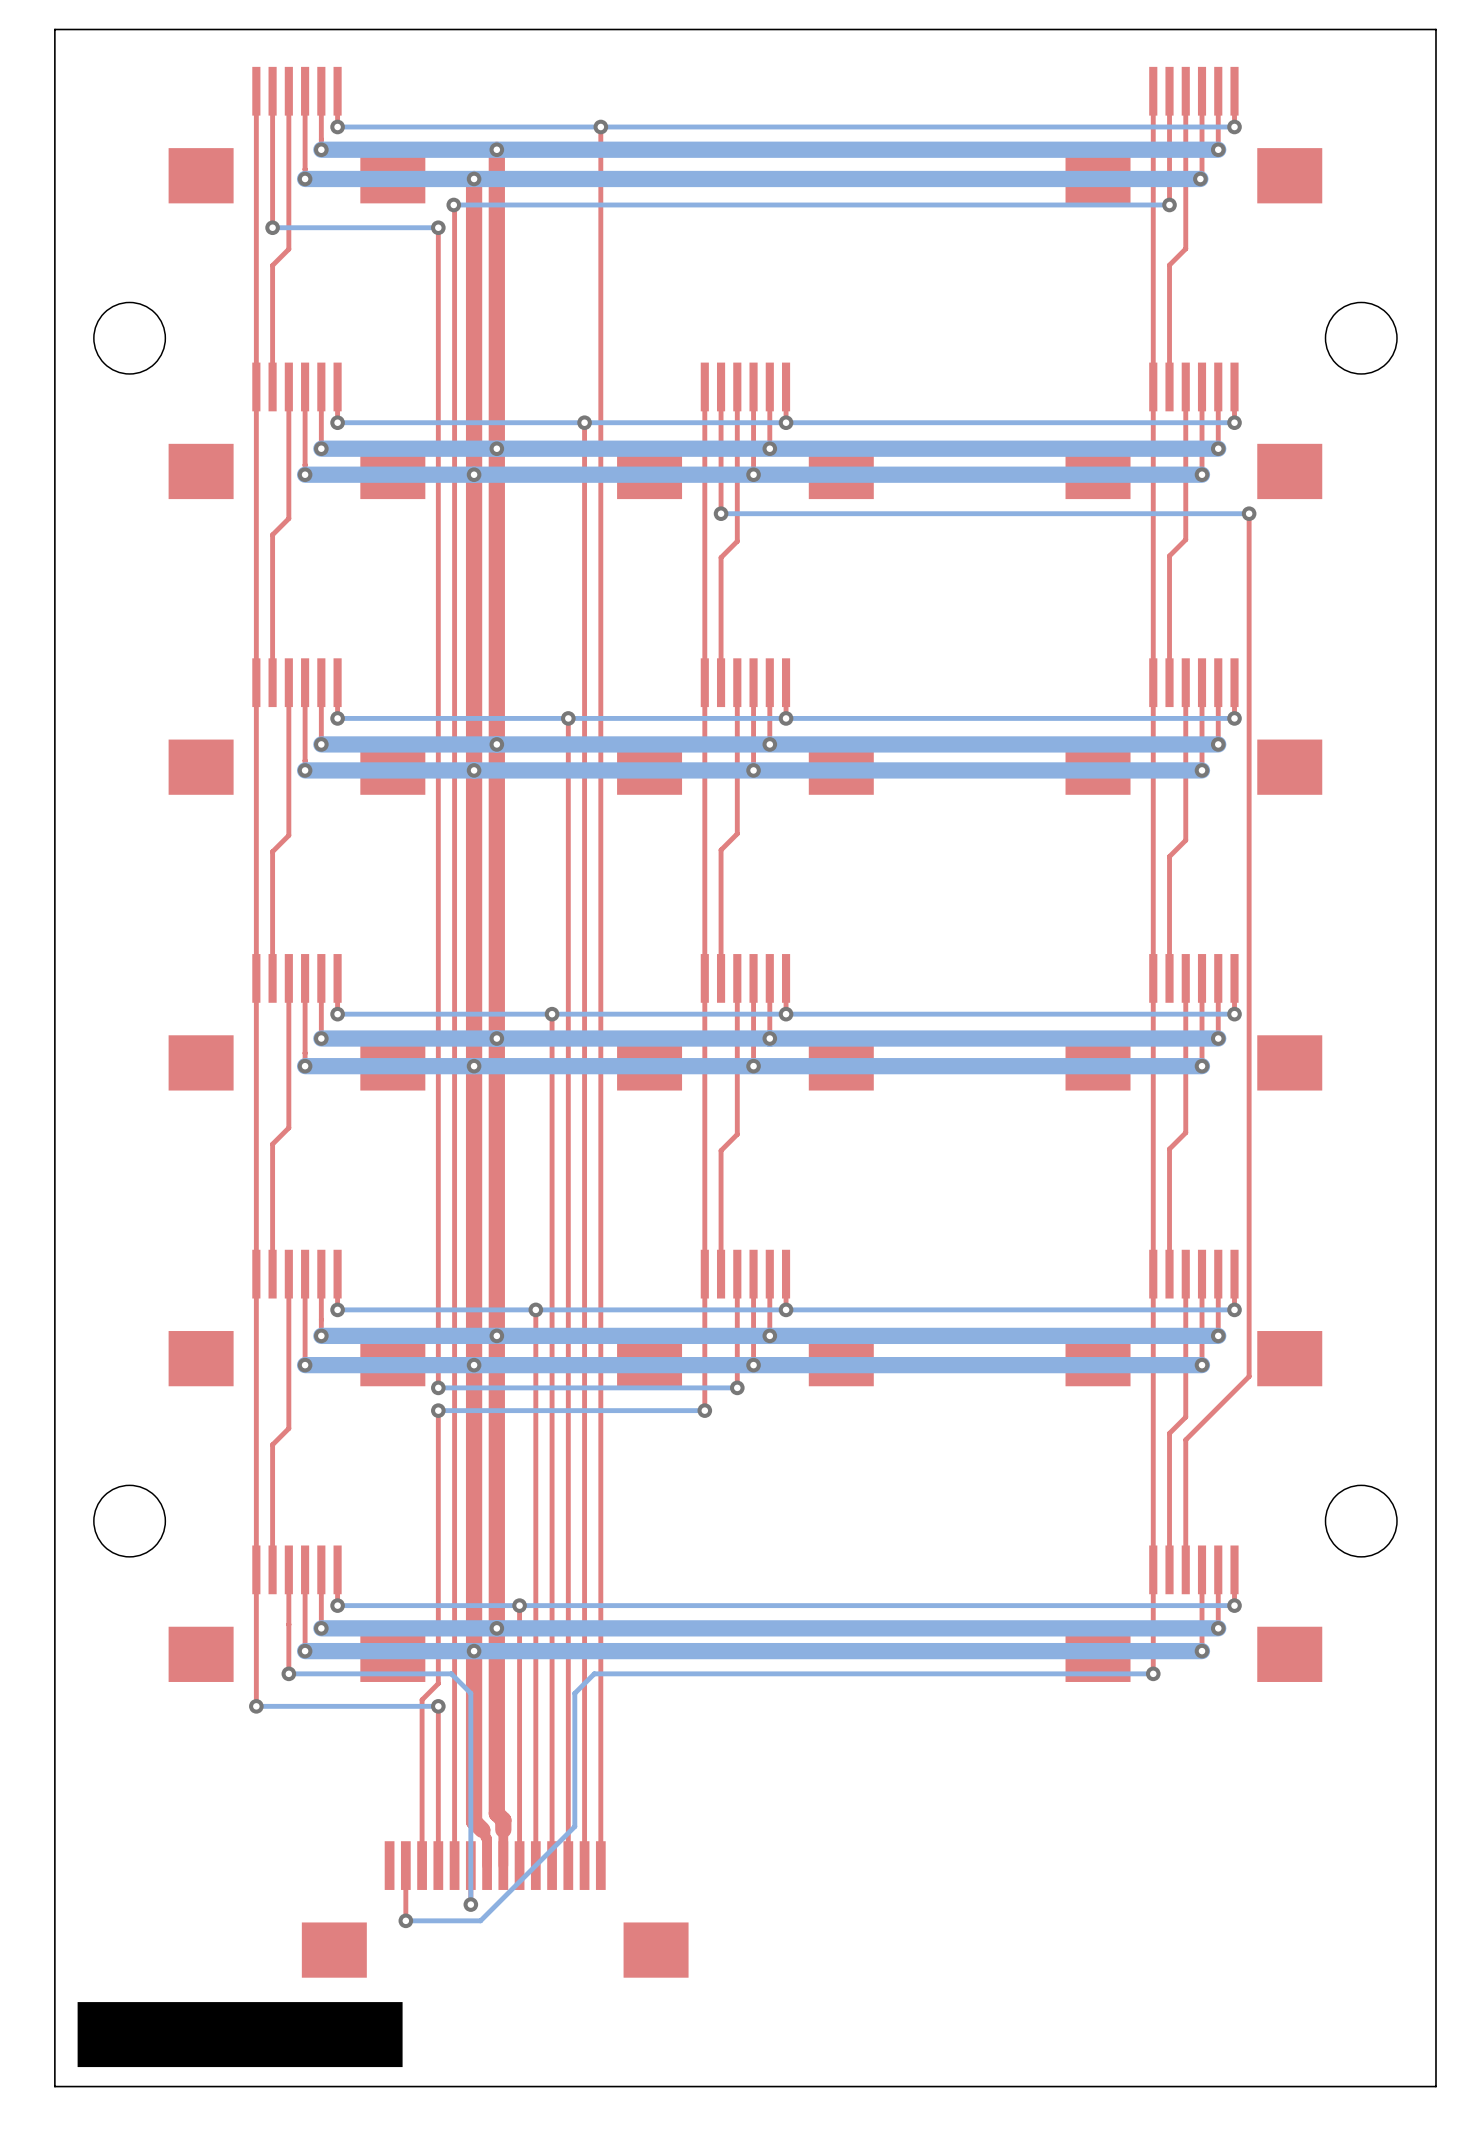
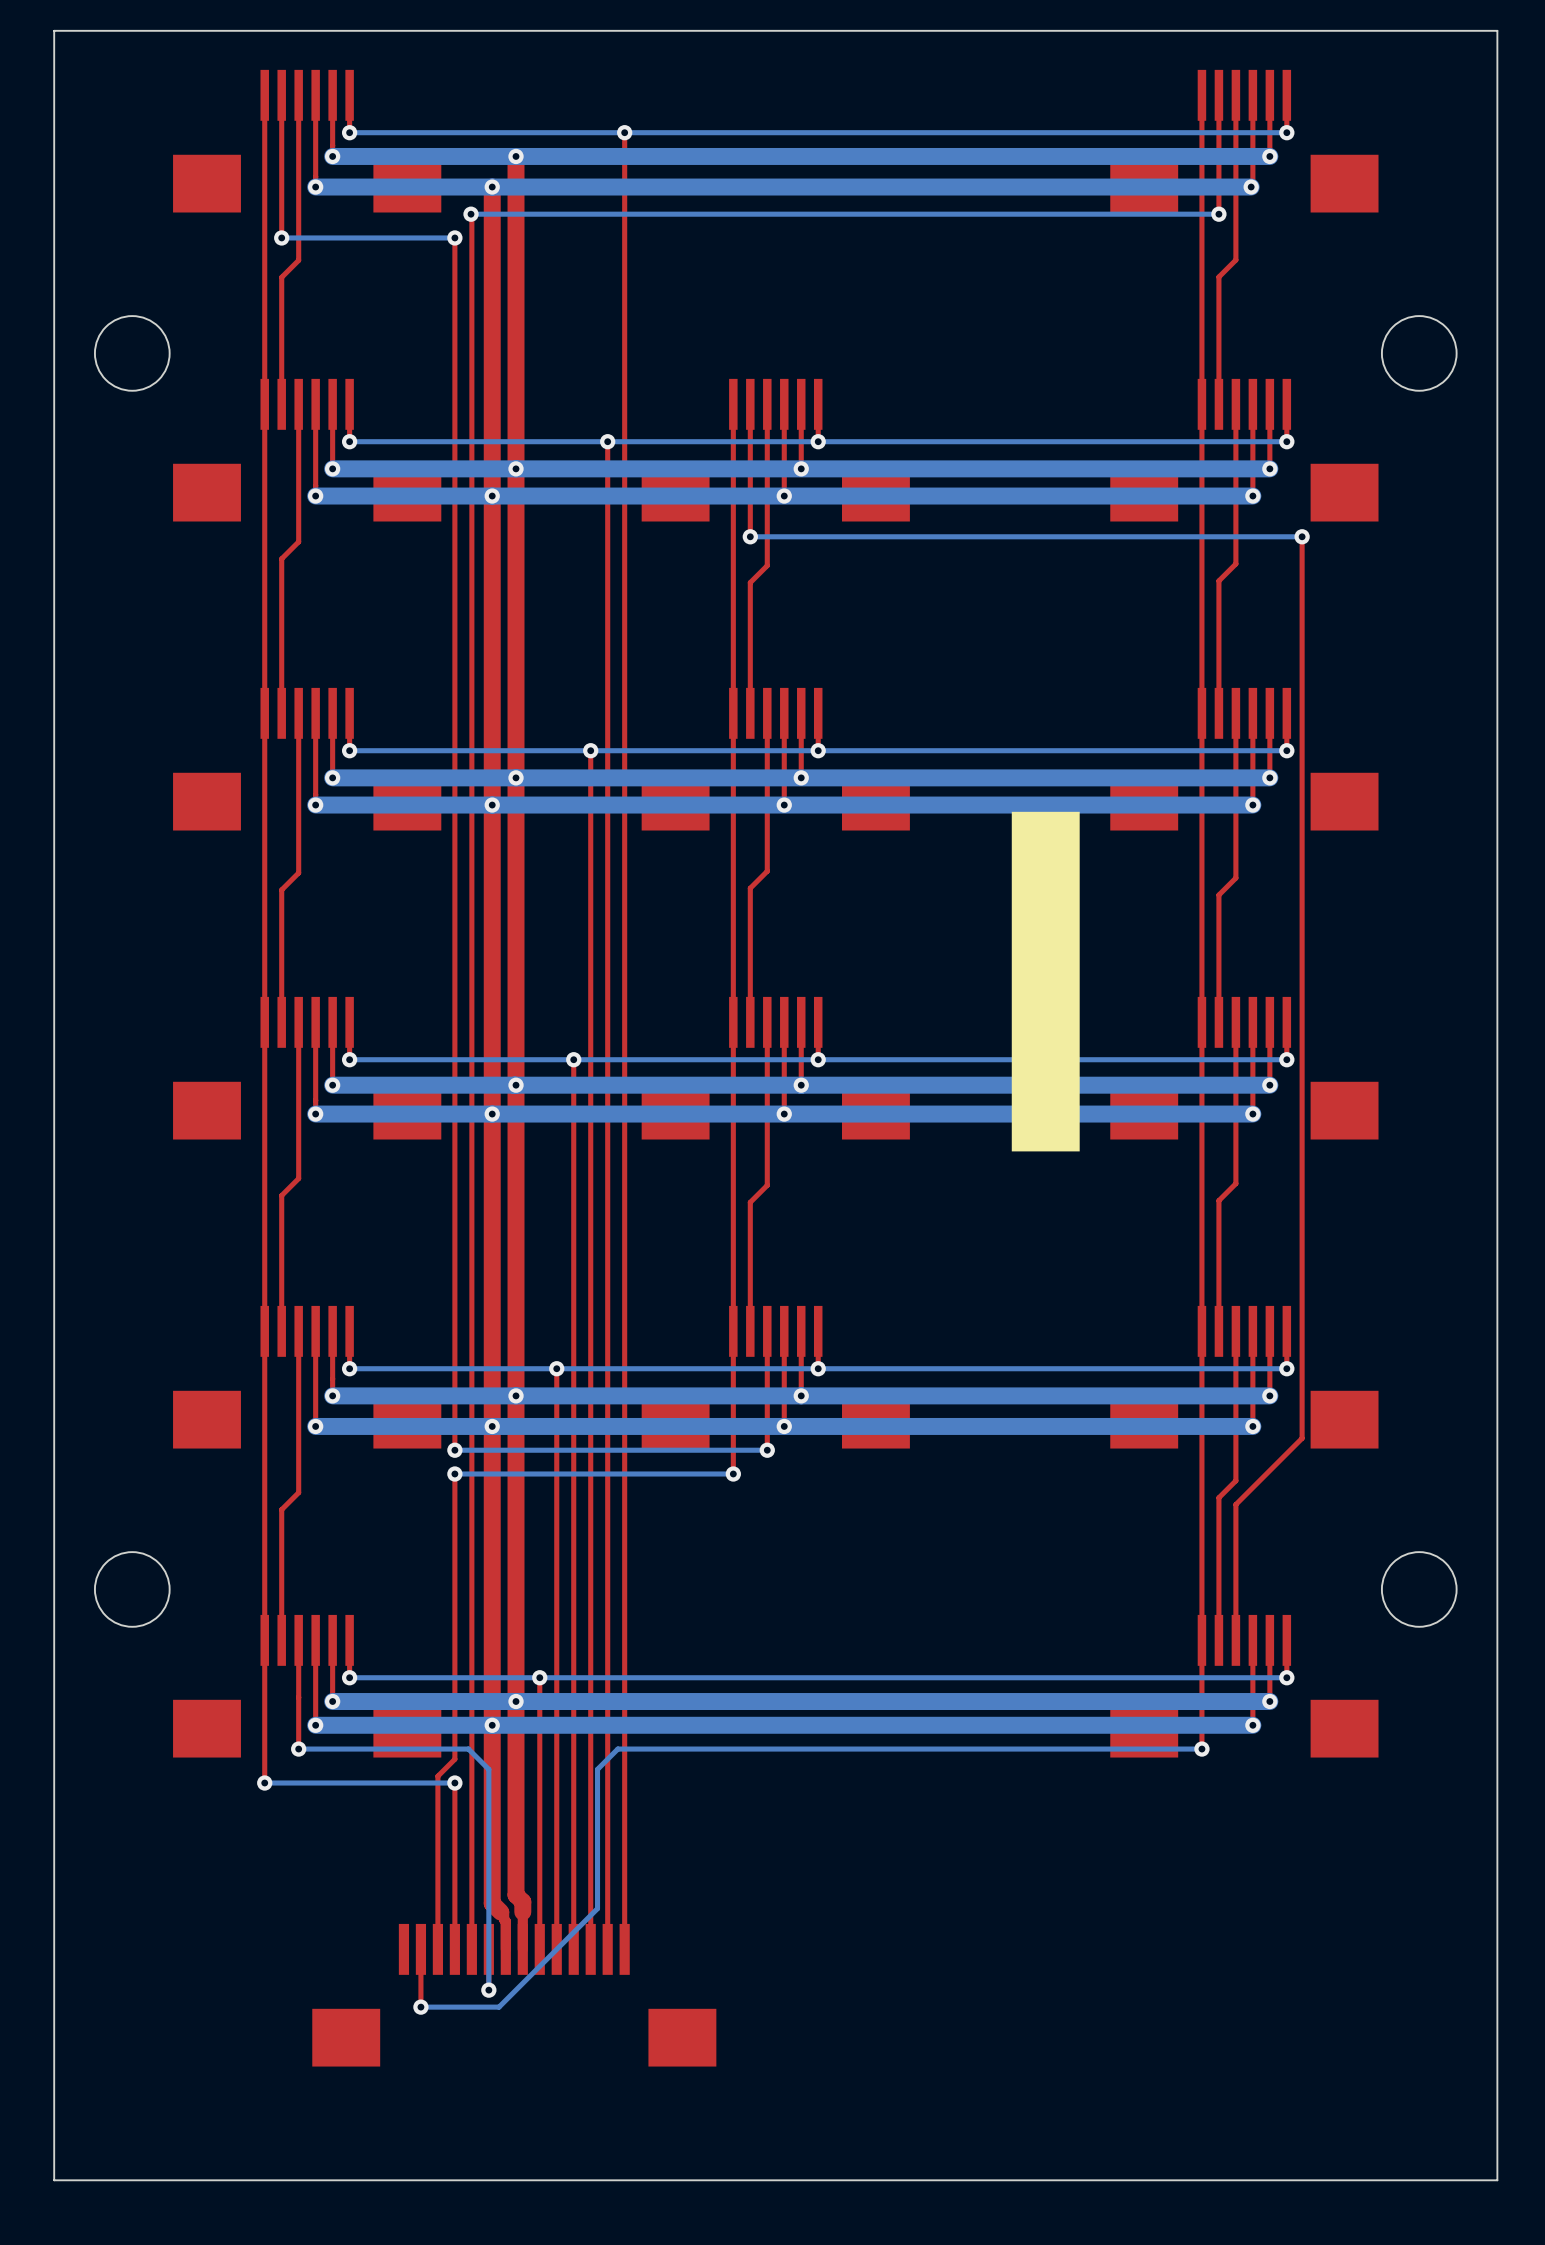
drawing: none -> [1011, 811, 1080, 1152]
drawing: [77, 2002, 403, 2068] -> none

